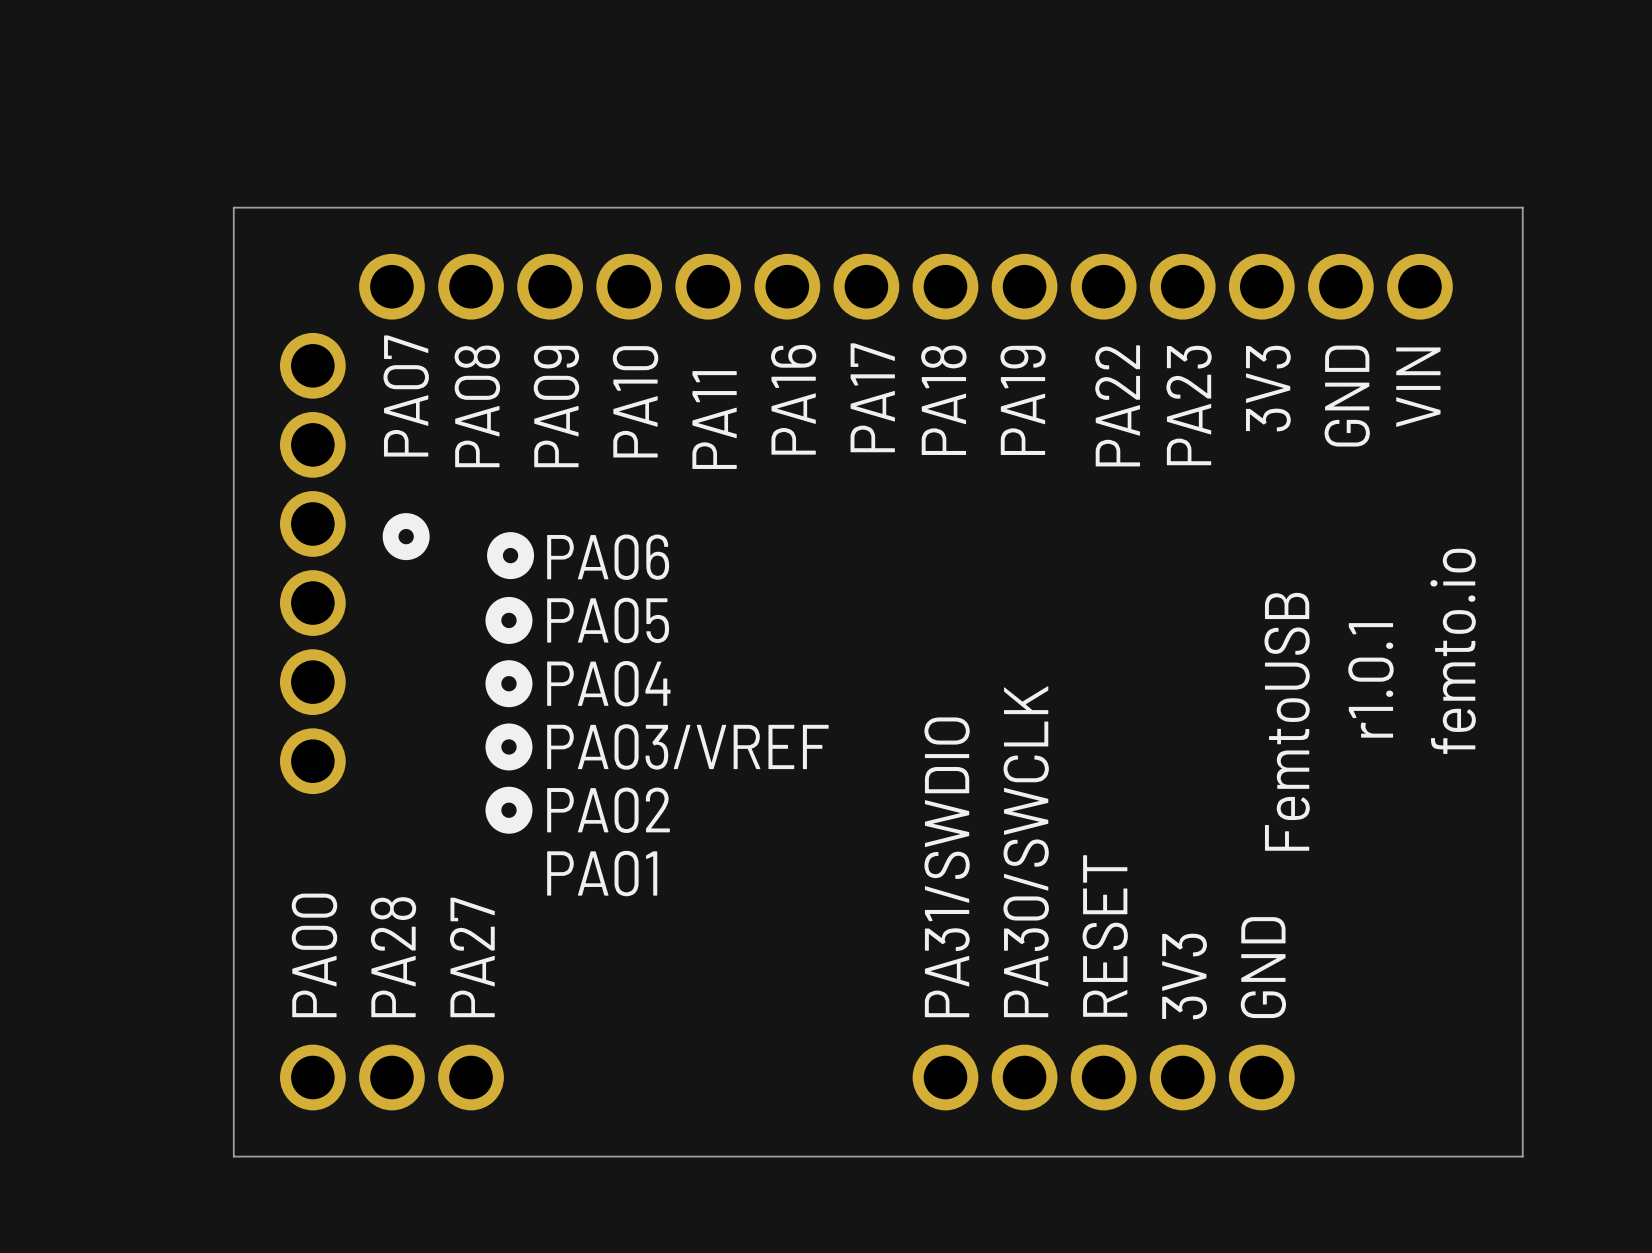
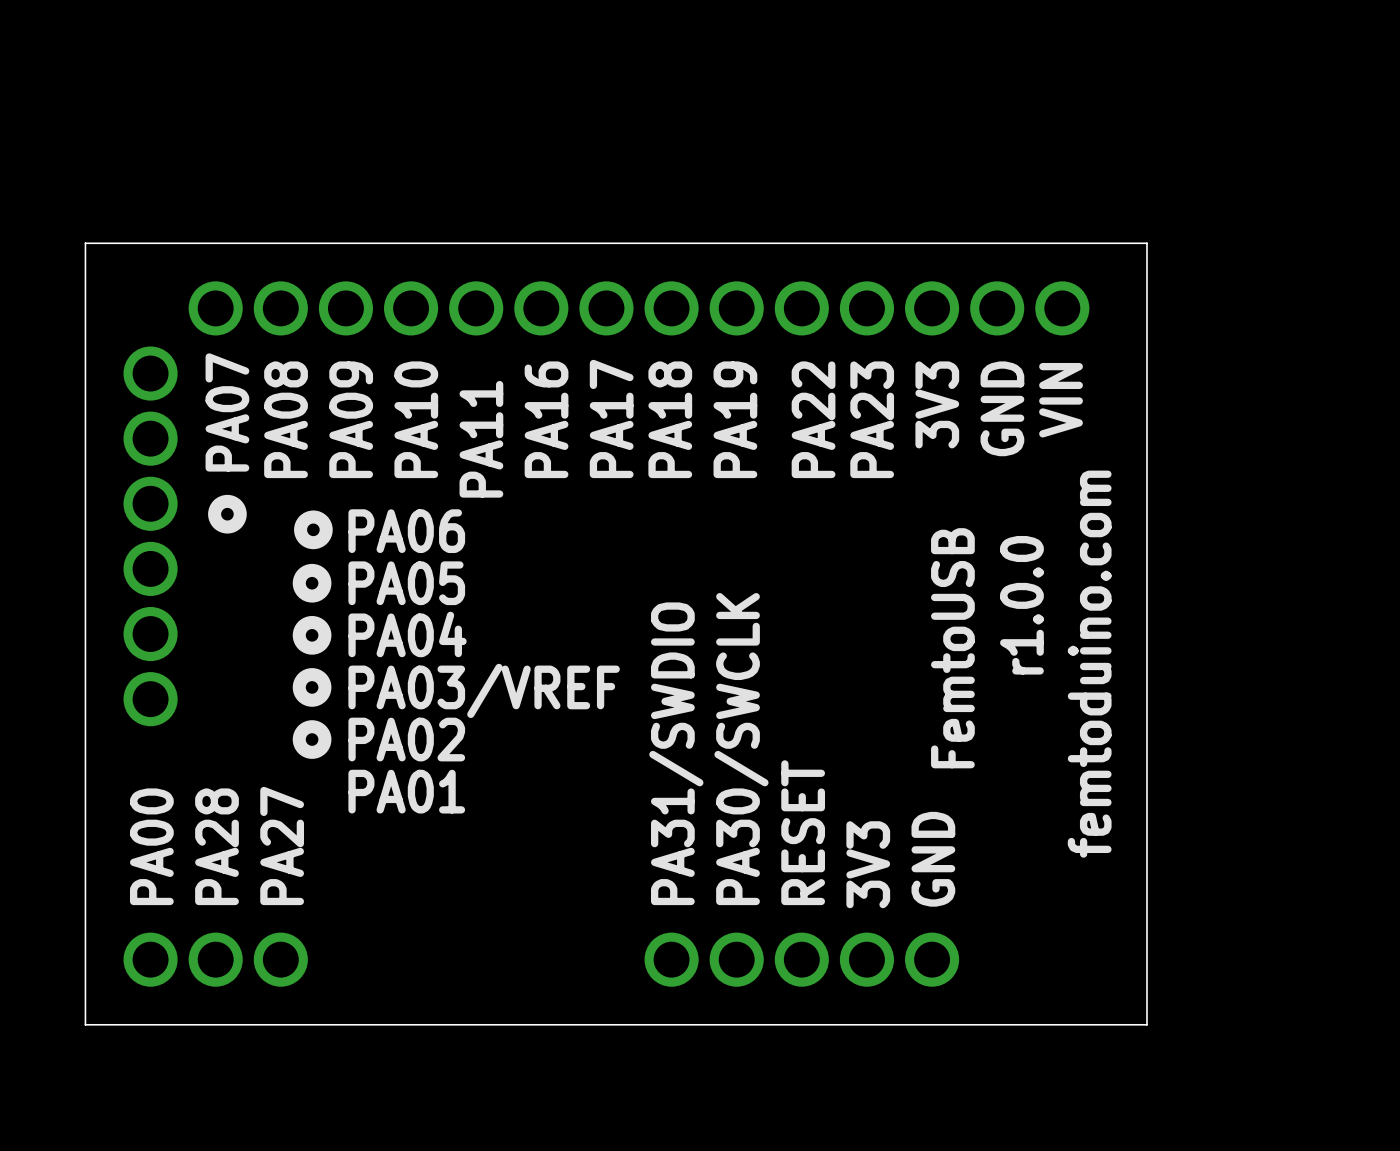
text: femto.io (1453, 651) -> femtoduino.com (1089, 664)
text: r1.0.1 (1370, 680) -> r1.0.0 (1021, 605)

